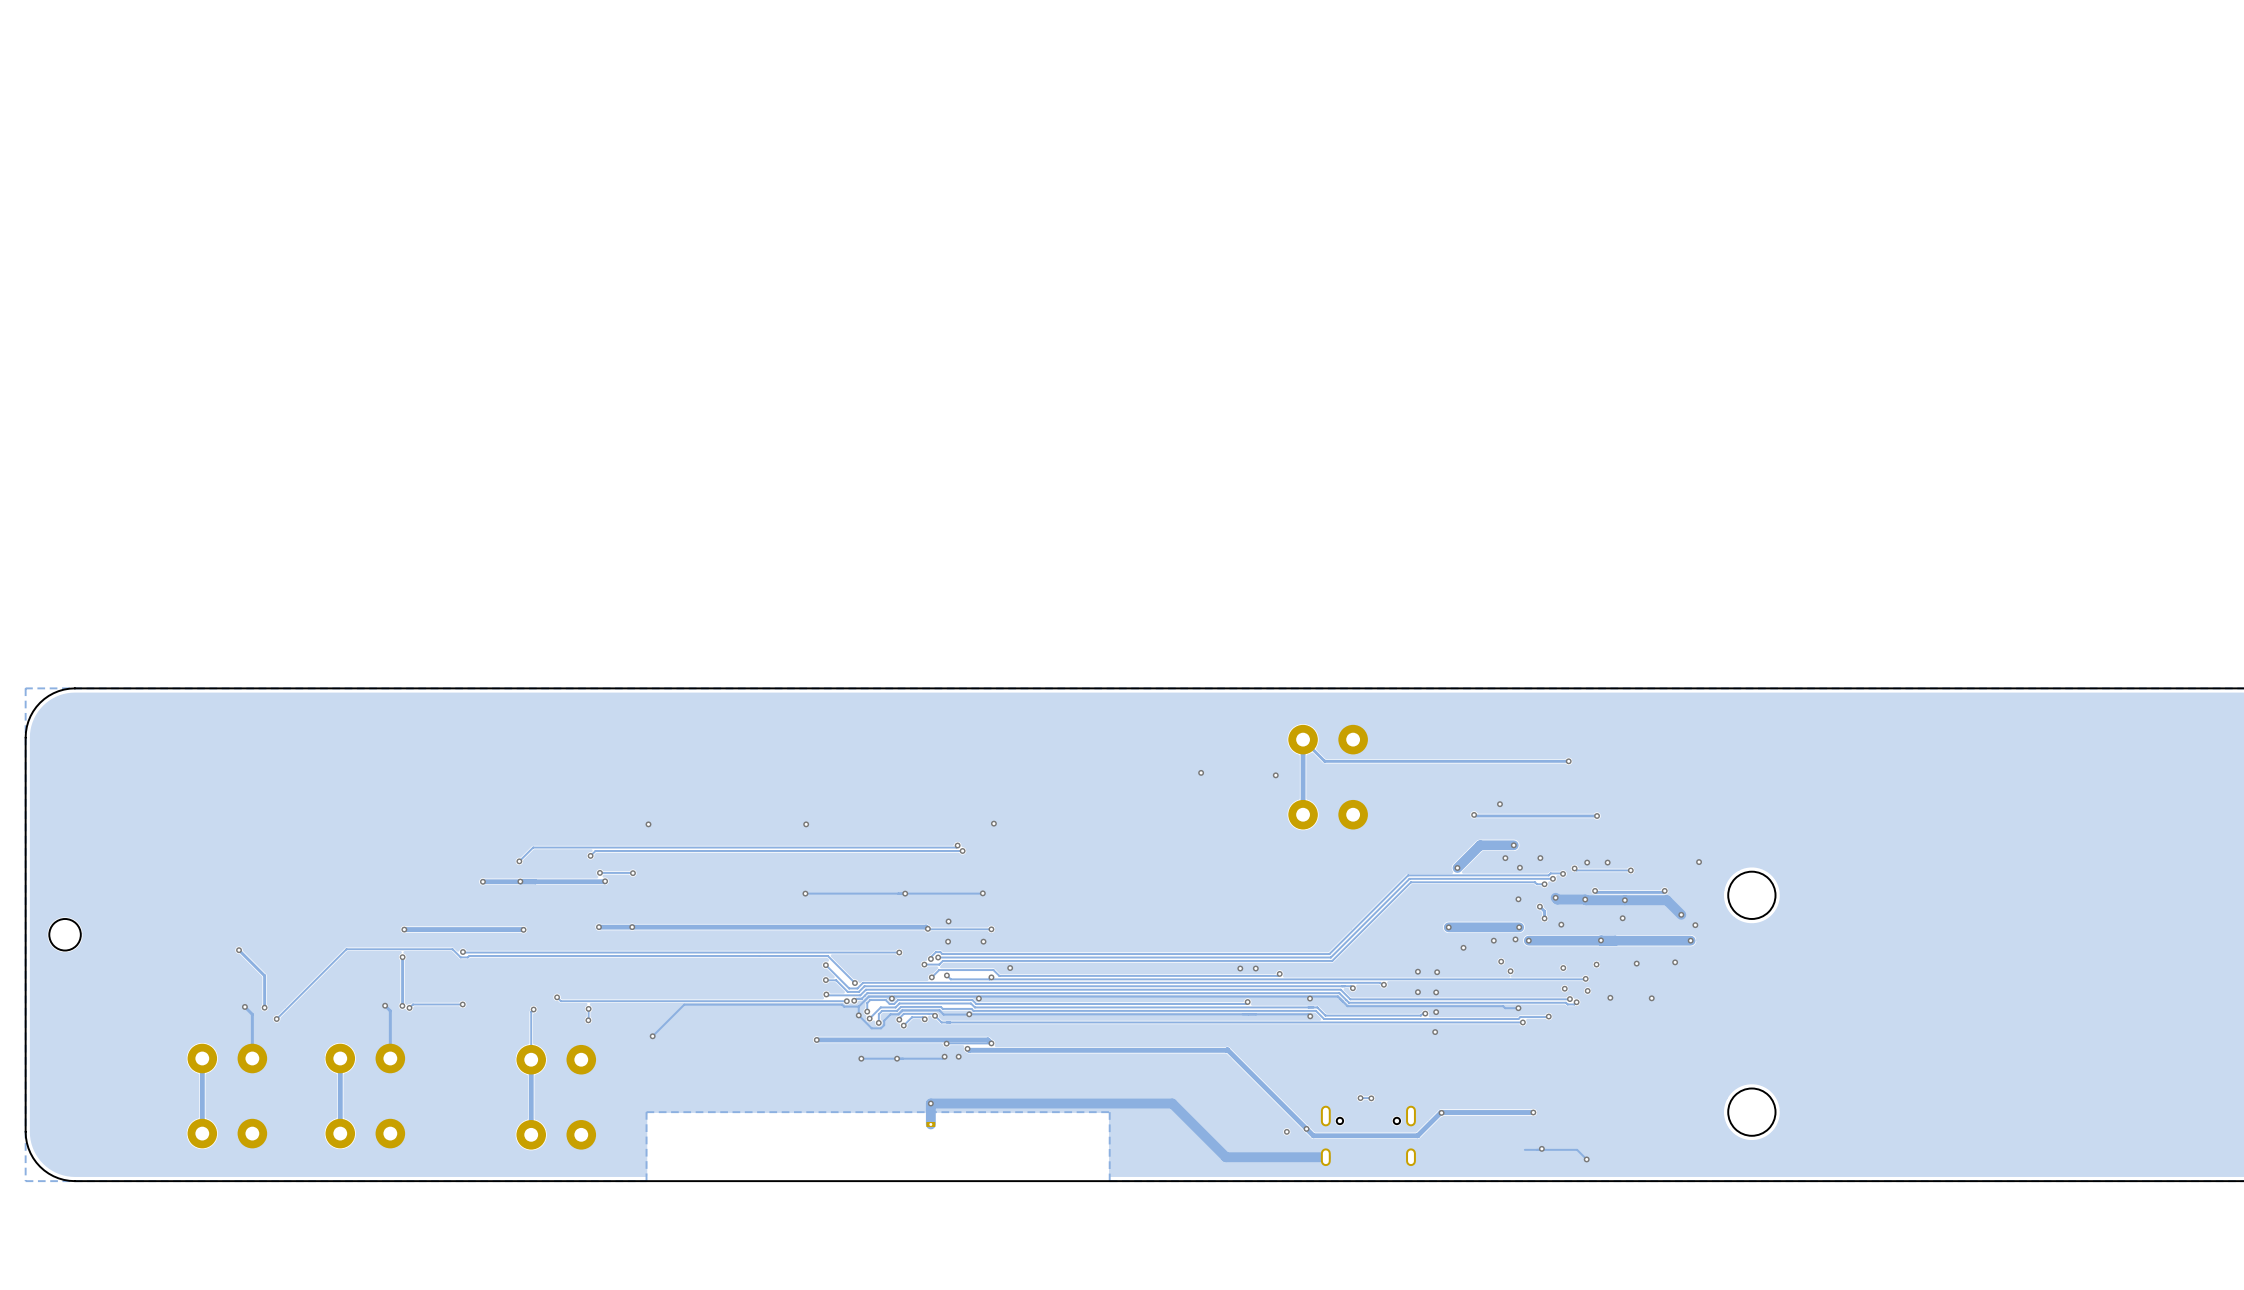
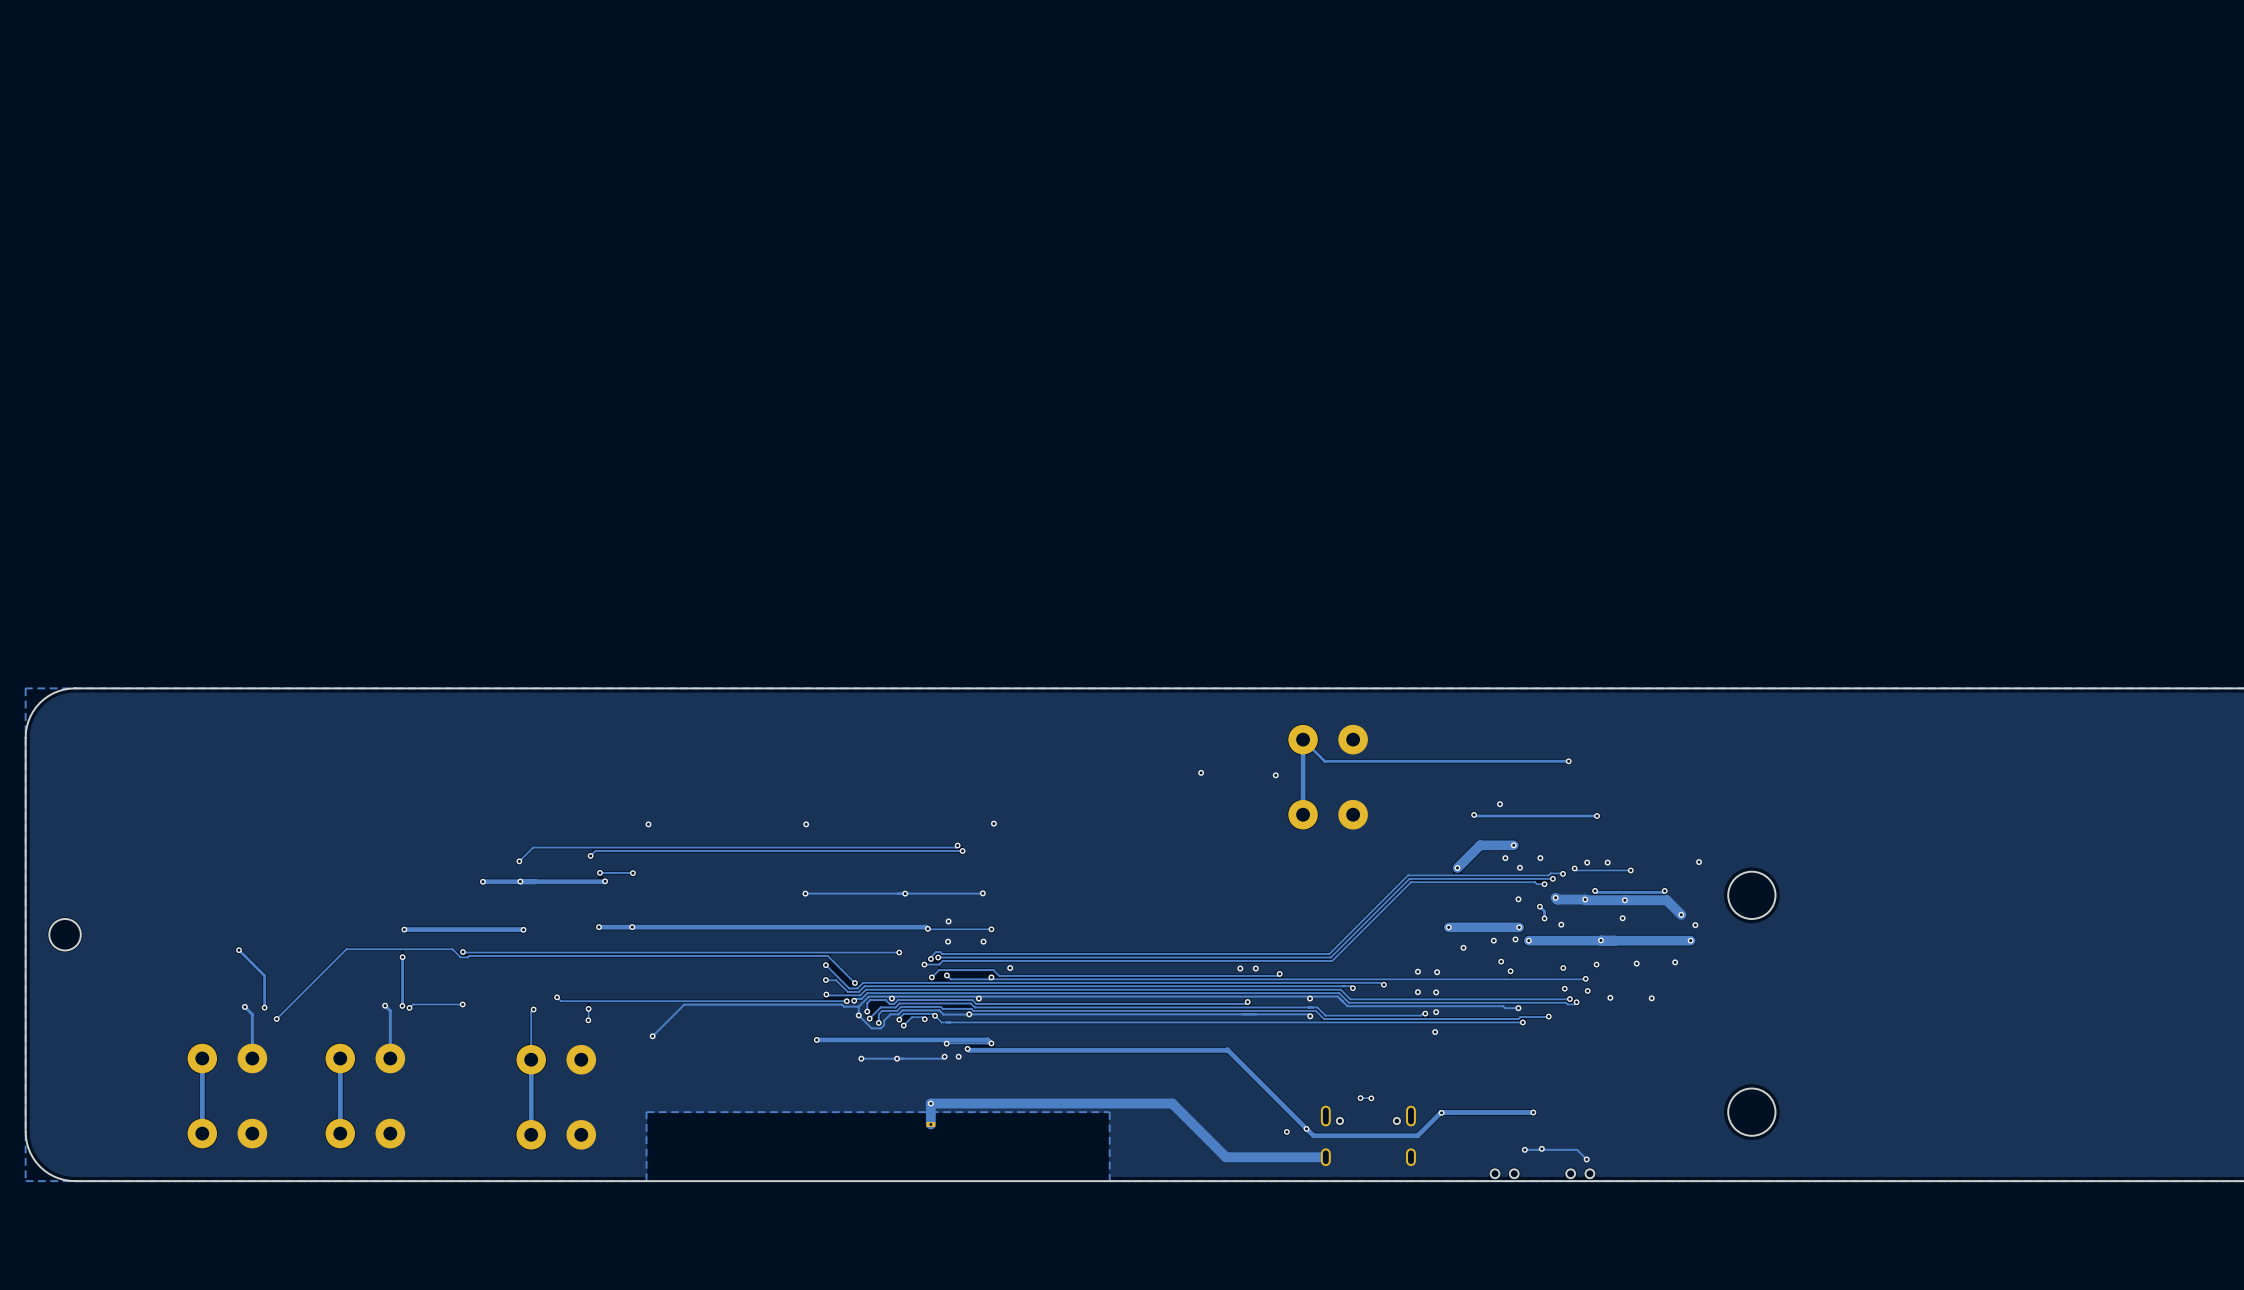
via: none -> (1524, 1149)
part: none -> (1504, 1173)
part: none -> (1580, 1173)

